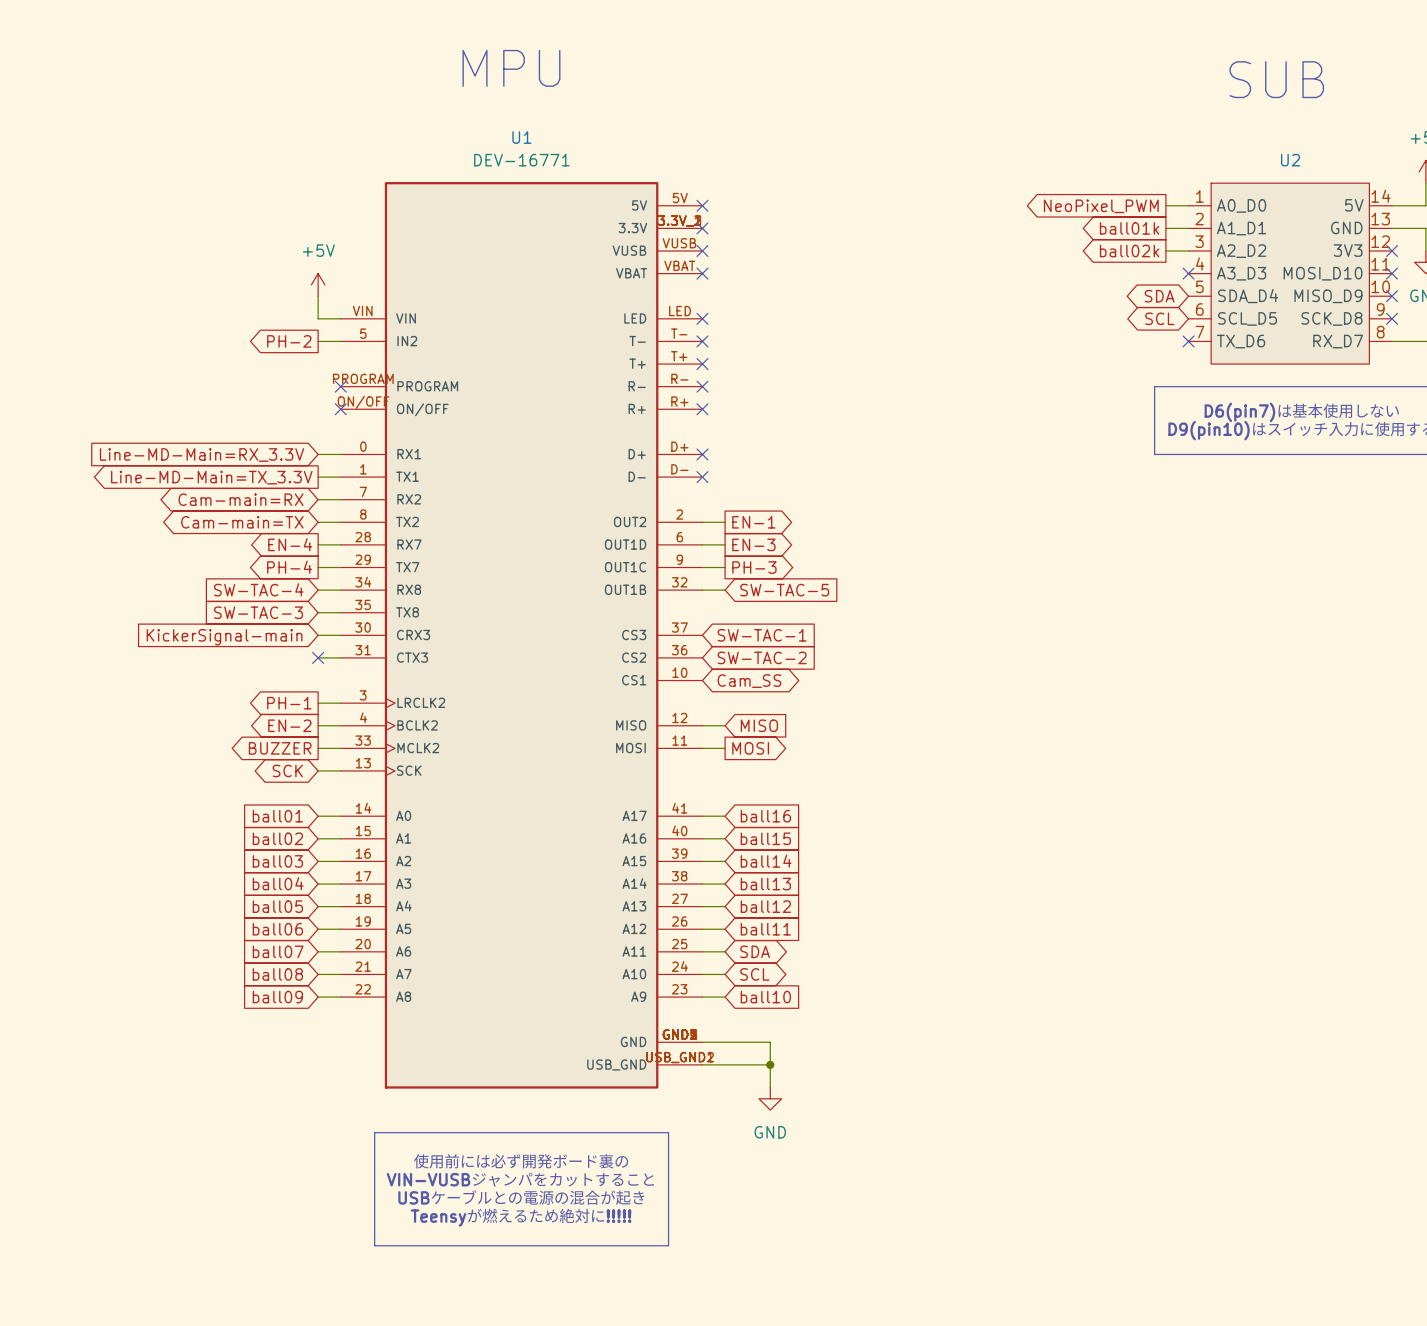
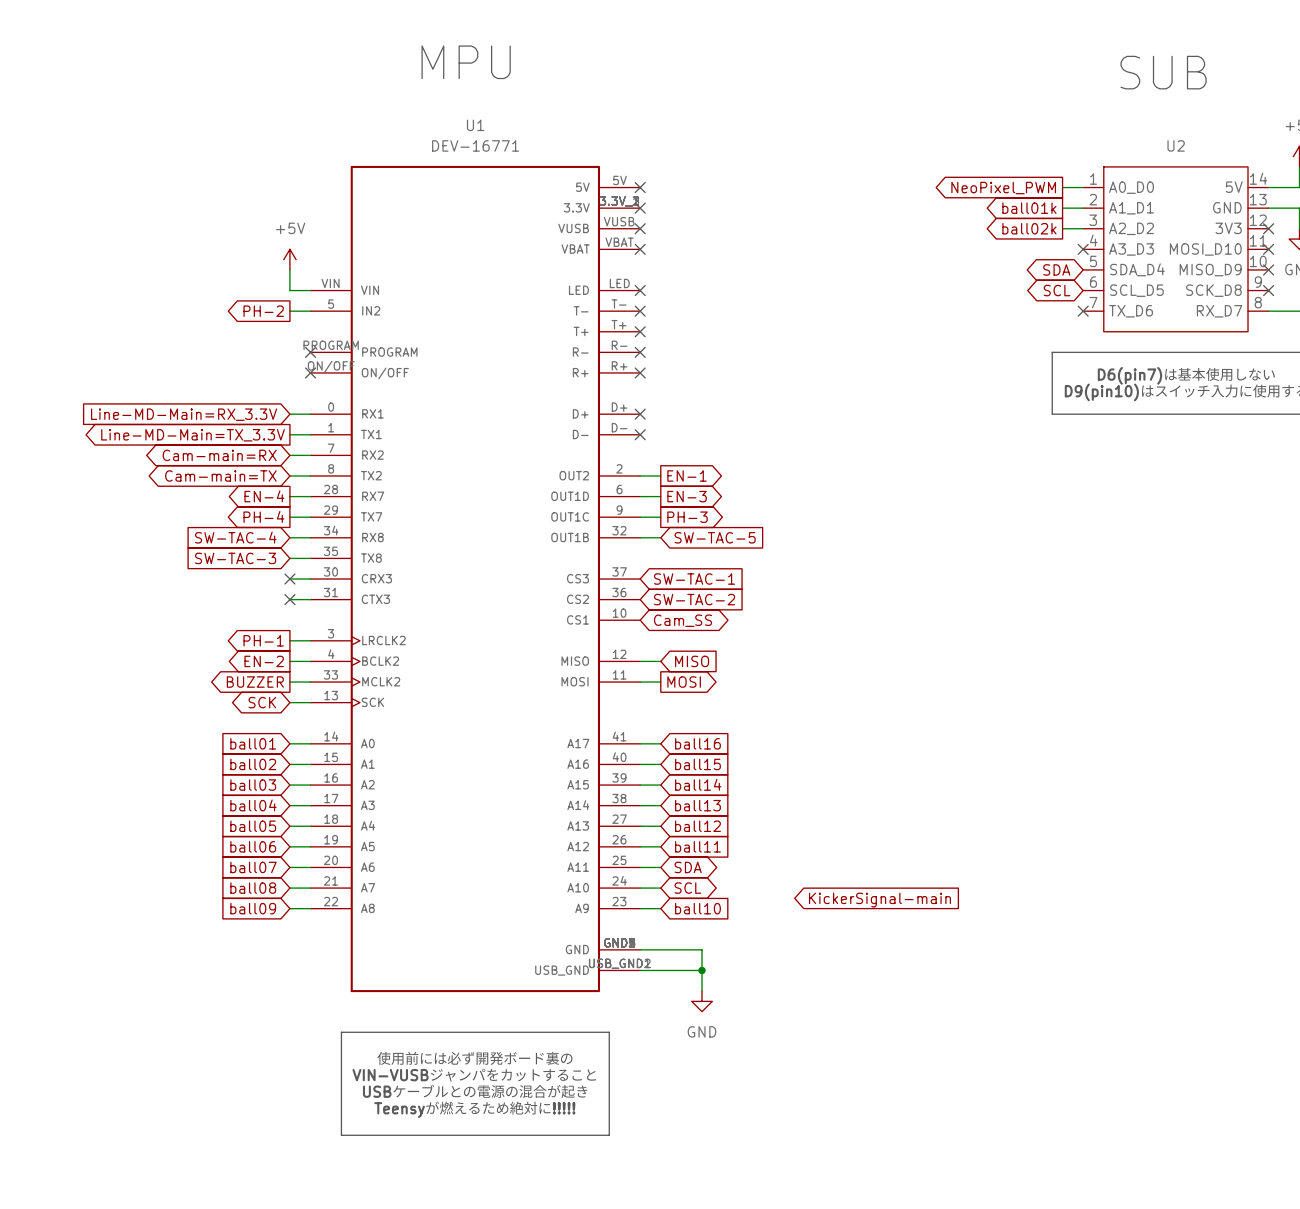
no-connect mark: none -> (289, 579)
global label: KickerSignal-main (224, 637) -> none
global label: none -> KickerSignal-main (879, 900)

